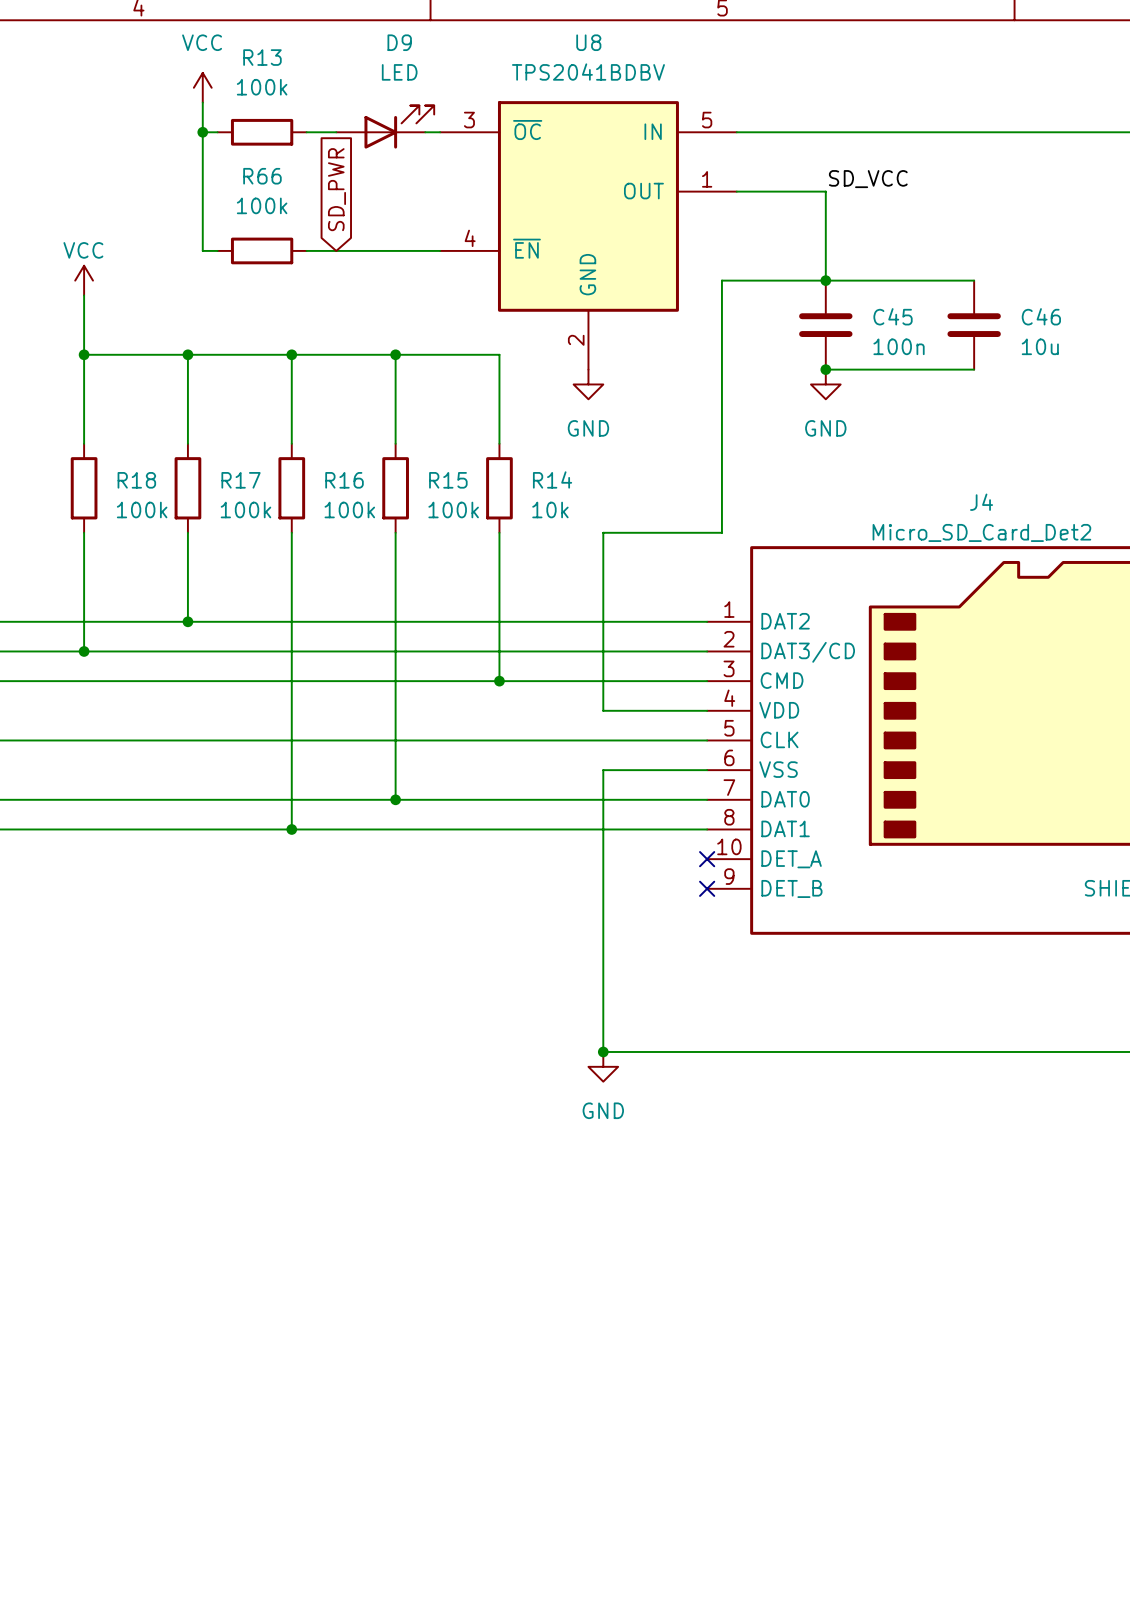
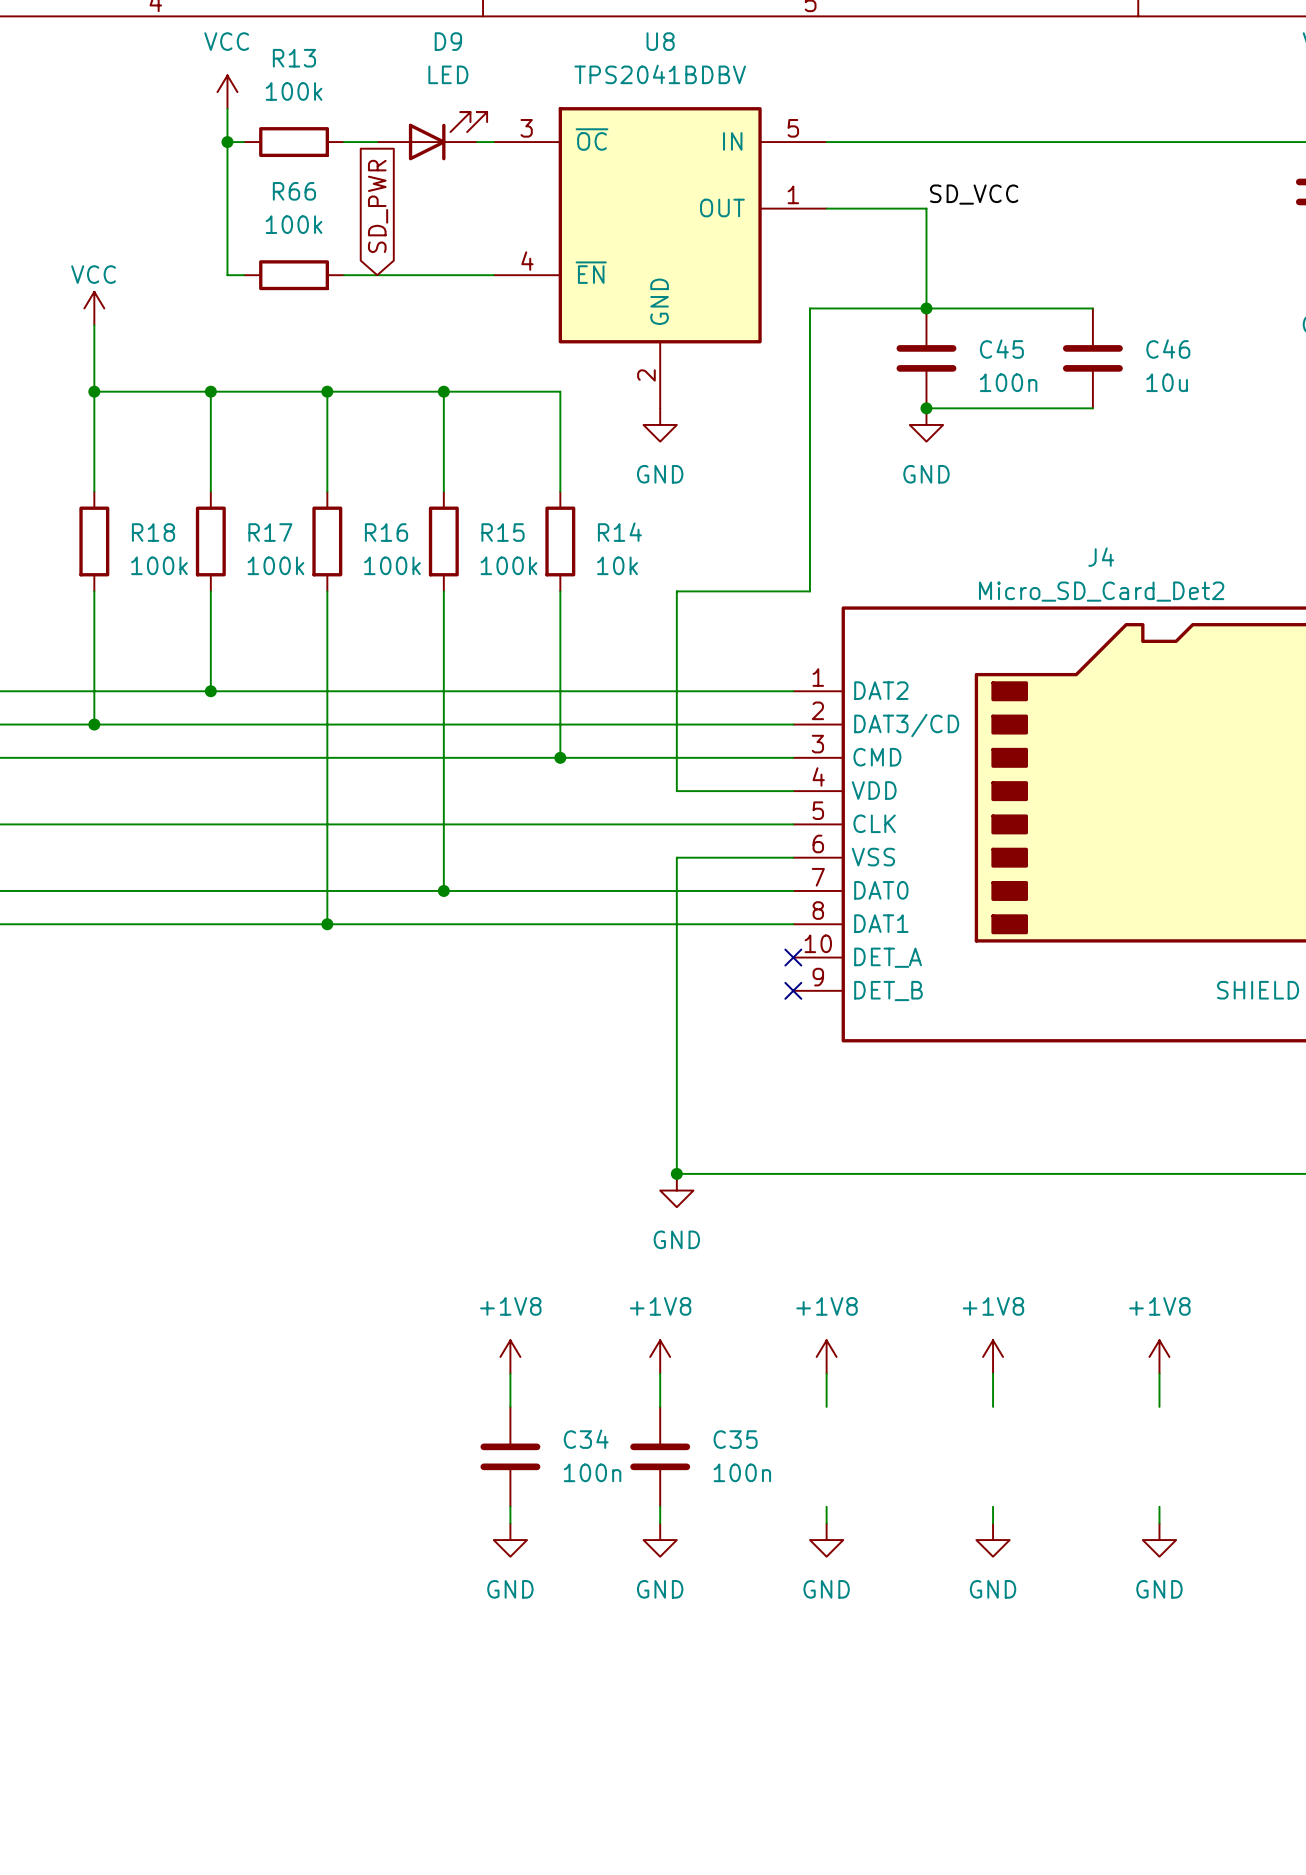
power symbol: none -> +1V8 (510, 1356)
power symbol: none -> +1V8 (660, 1356)
power symbol: none -> +1V8 (826, 1356)
power symbol: none -> +1V8 (993, 1356)
power symbol: none -> +1V8 (1159, 1356)
wire: none -> (510, 1373) (510, 1406)
wire: none -> (660, 1373) (660, 1406)
wire: none -> (826, 1373) (826, 1406)
wire: none -> (993, 1373) (993, 1406)
wire: none -> (1159, 1373) (1159, 1406)
C34: none -> 100n (510, 1456)
C35: none -> 100n (660, 1456)
wire: none -> (510, 1506) (510, 1523)
wire: none -> (660, 1506) (660, 1523)
wire: none -> (826, 1506) (826, 1523)
wire: none -> (993, 1506) (993, 1523)
wire: none -> (1159, 1506) (1159, 1523)
power symbol: none -> GND (510, 1540)
power symbol: none -> GND (660, 1540)
power symbol: none -> GND (826, 1540)
power symbol: none -> GND (993, 1540)
power symbol: none -> GND (1159, 1540)

